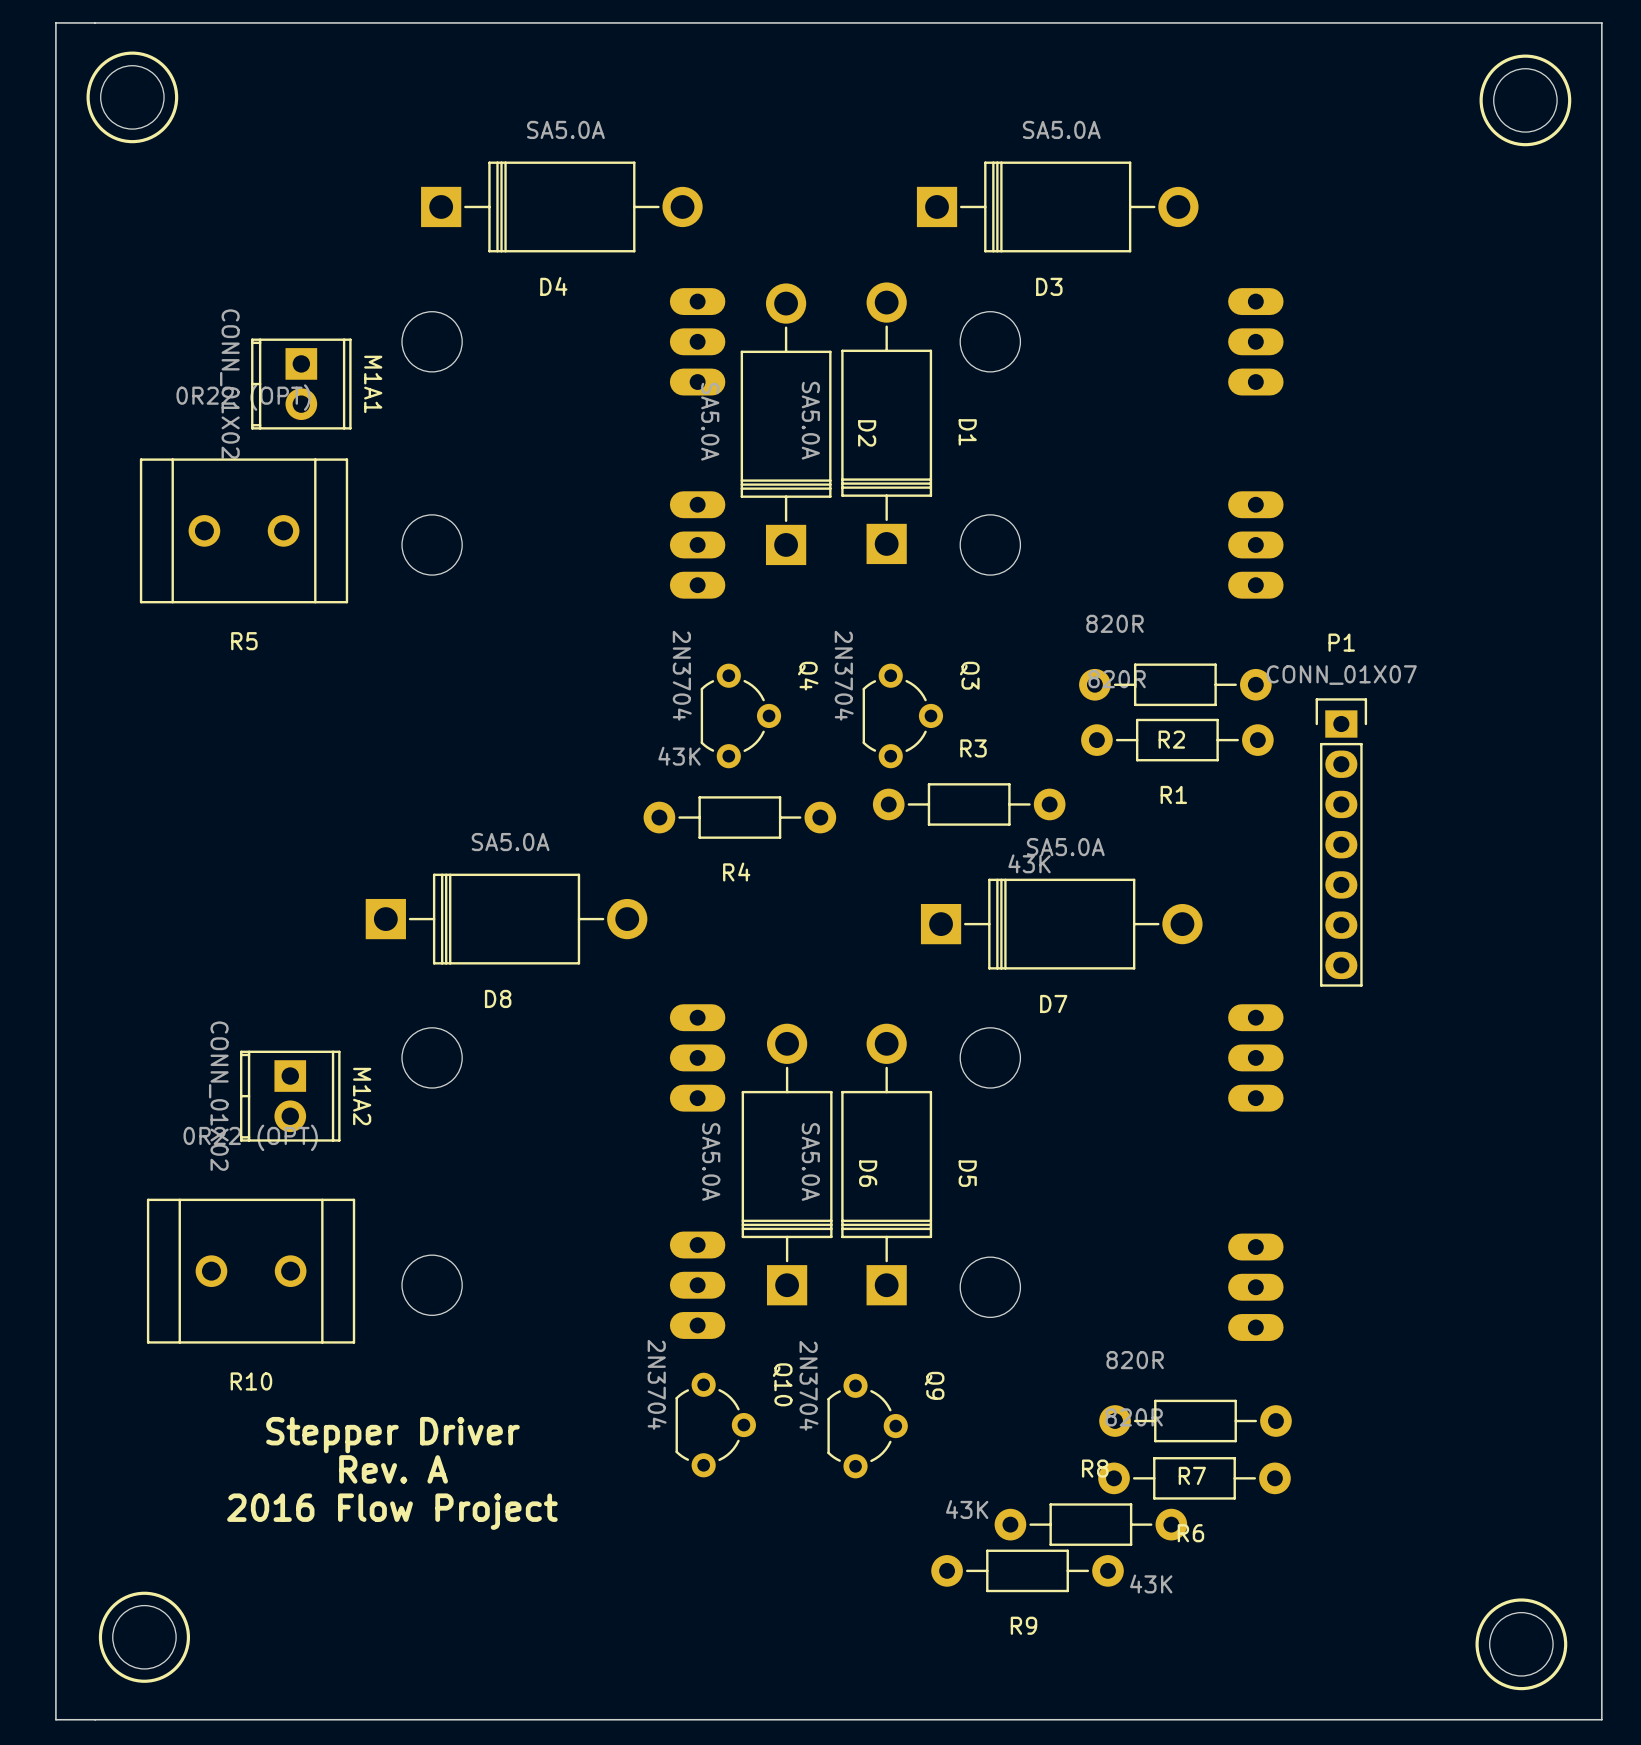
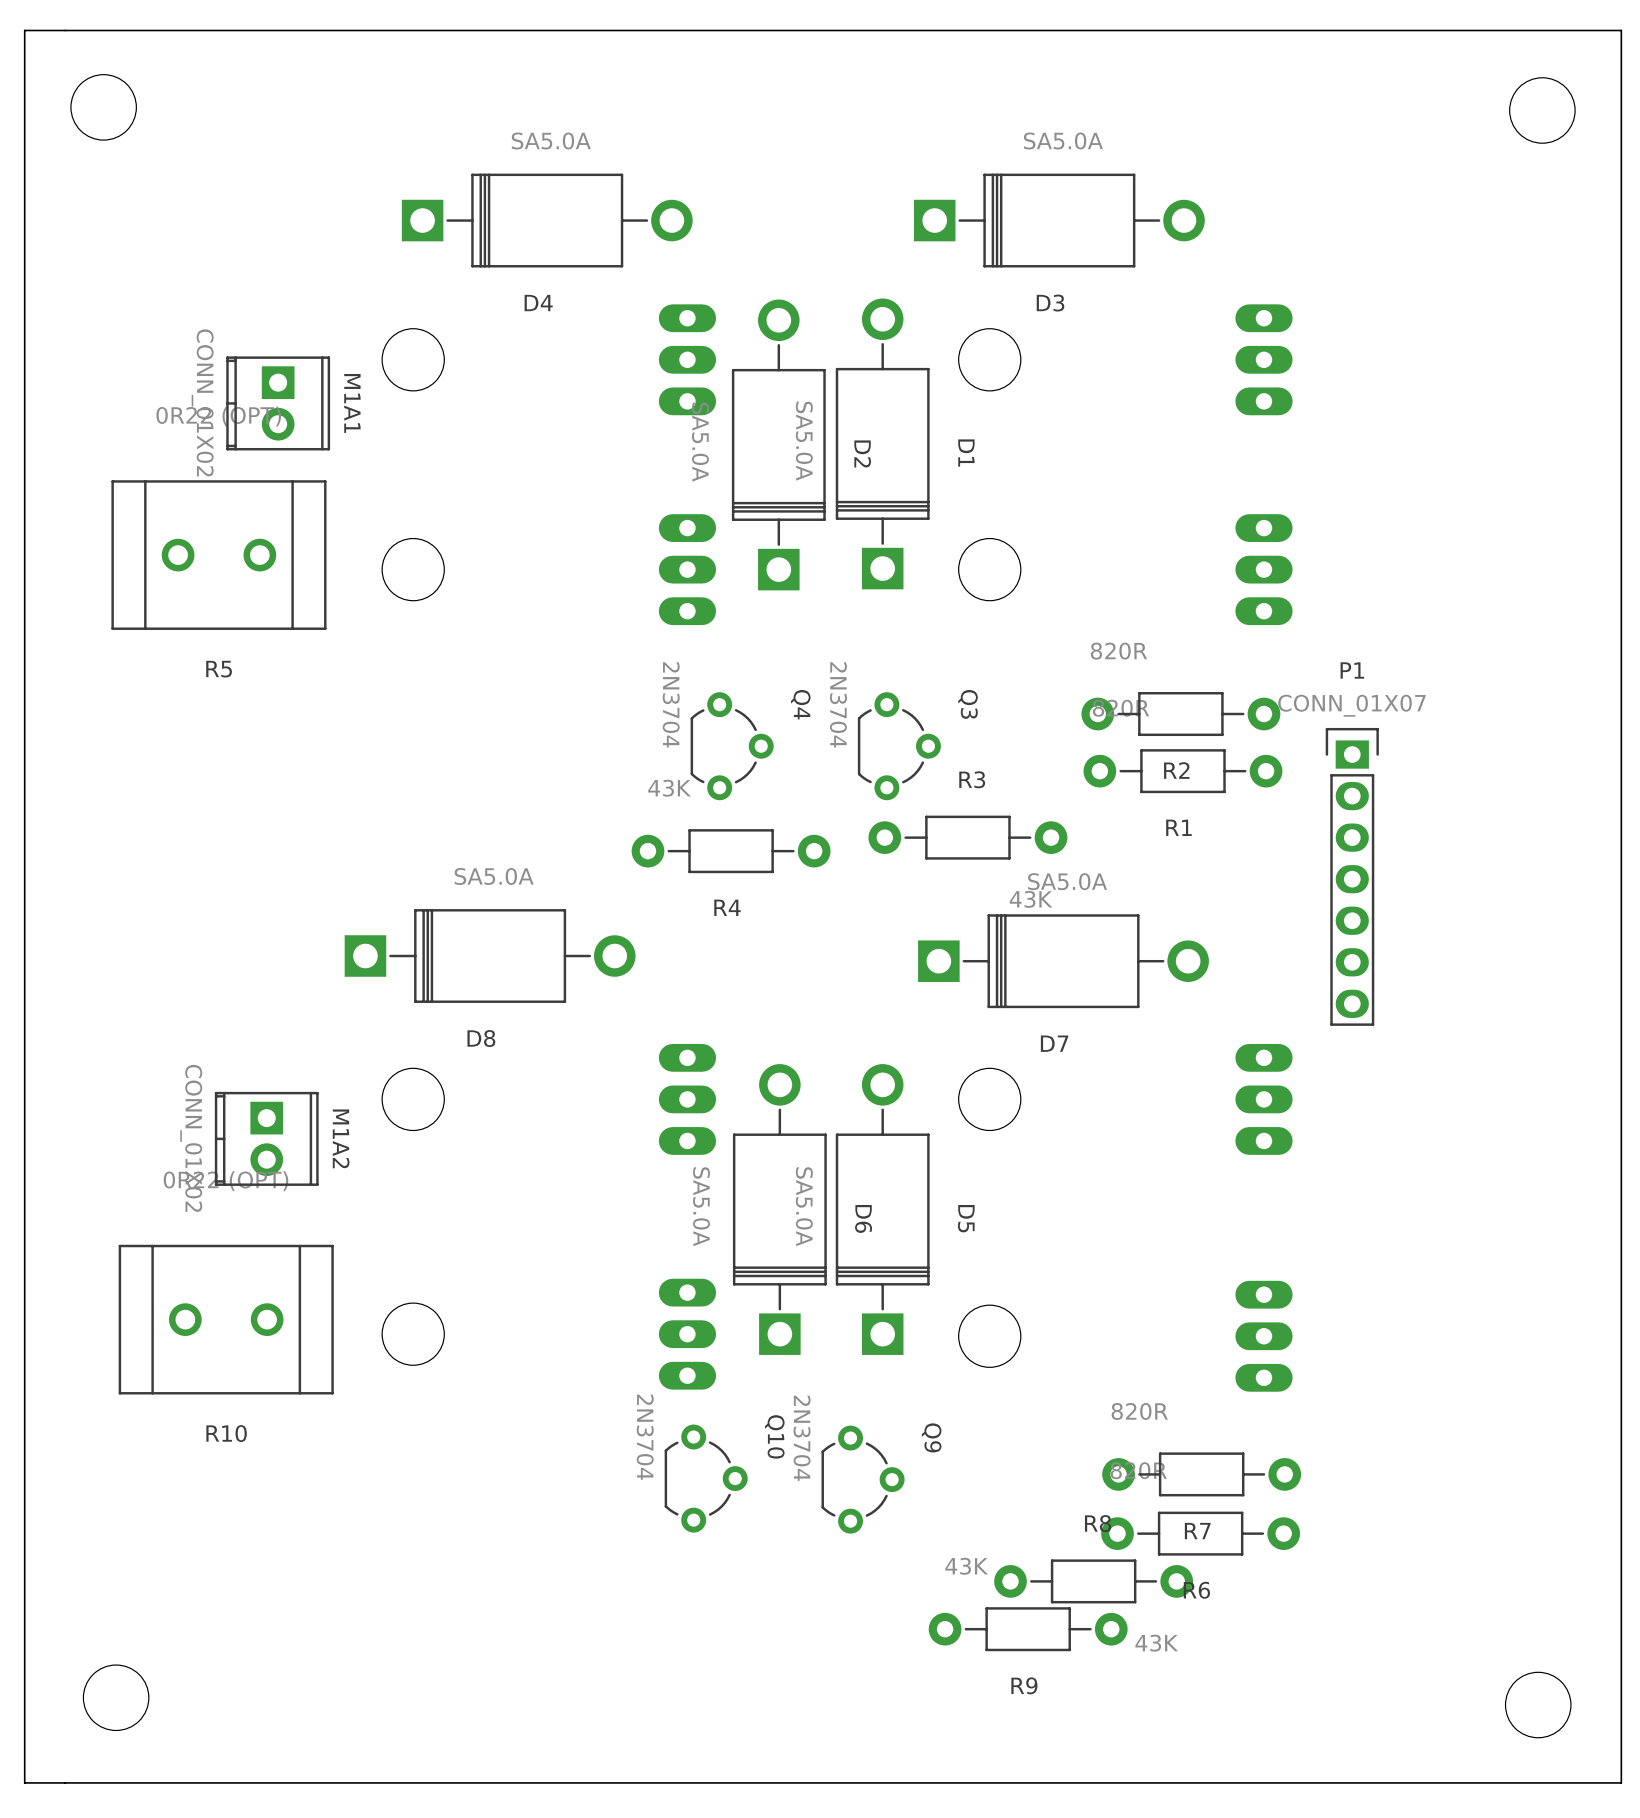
drawing: [86, 51, 179, 144] -> none
drawing: [1479, 54, 1572, 147] -> none
text: Stepper Driver (392, 1435) -> none
text: Rev. A (393, 1469) -> none
text: 2016 Flow Project (392, 1511) -> none
drawing: [98, 1591, 191, 1683] -> none
drawing: [1475, 1598, 1568, 1691] -> none

